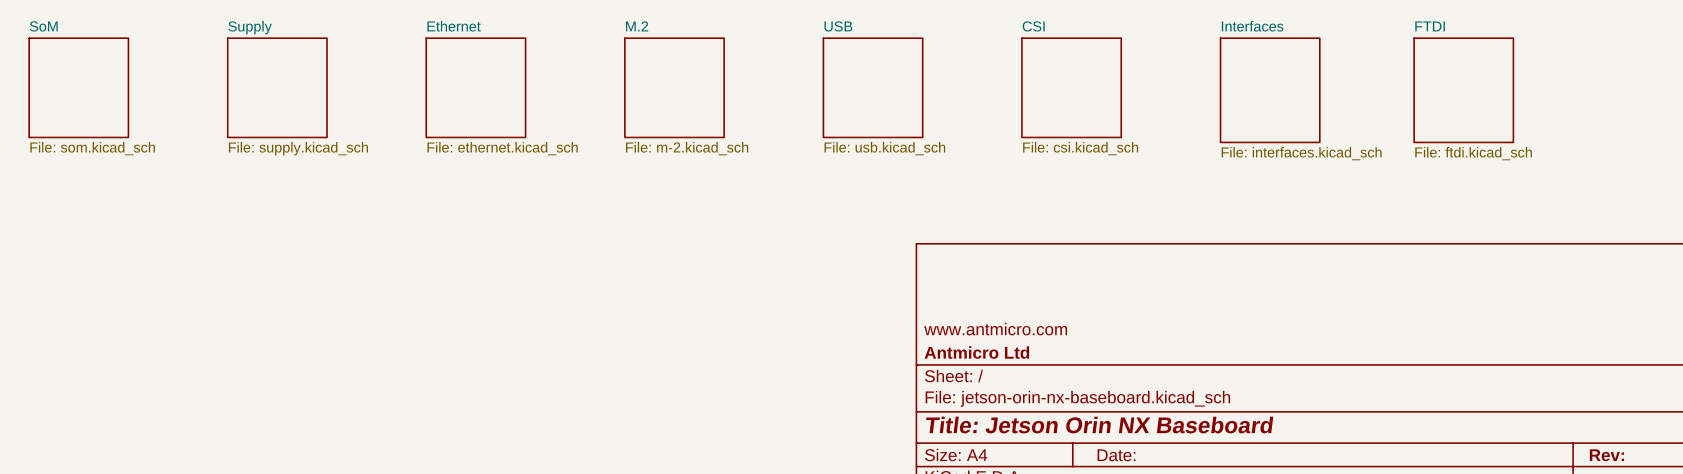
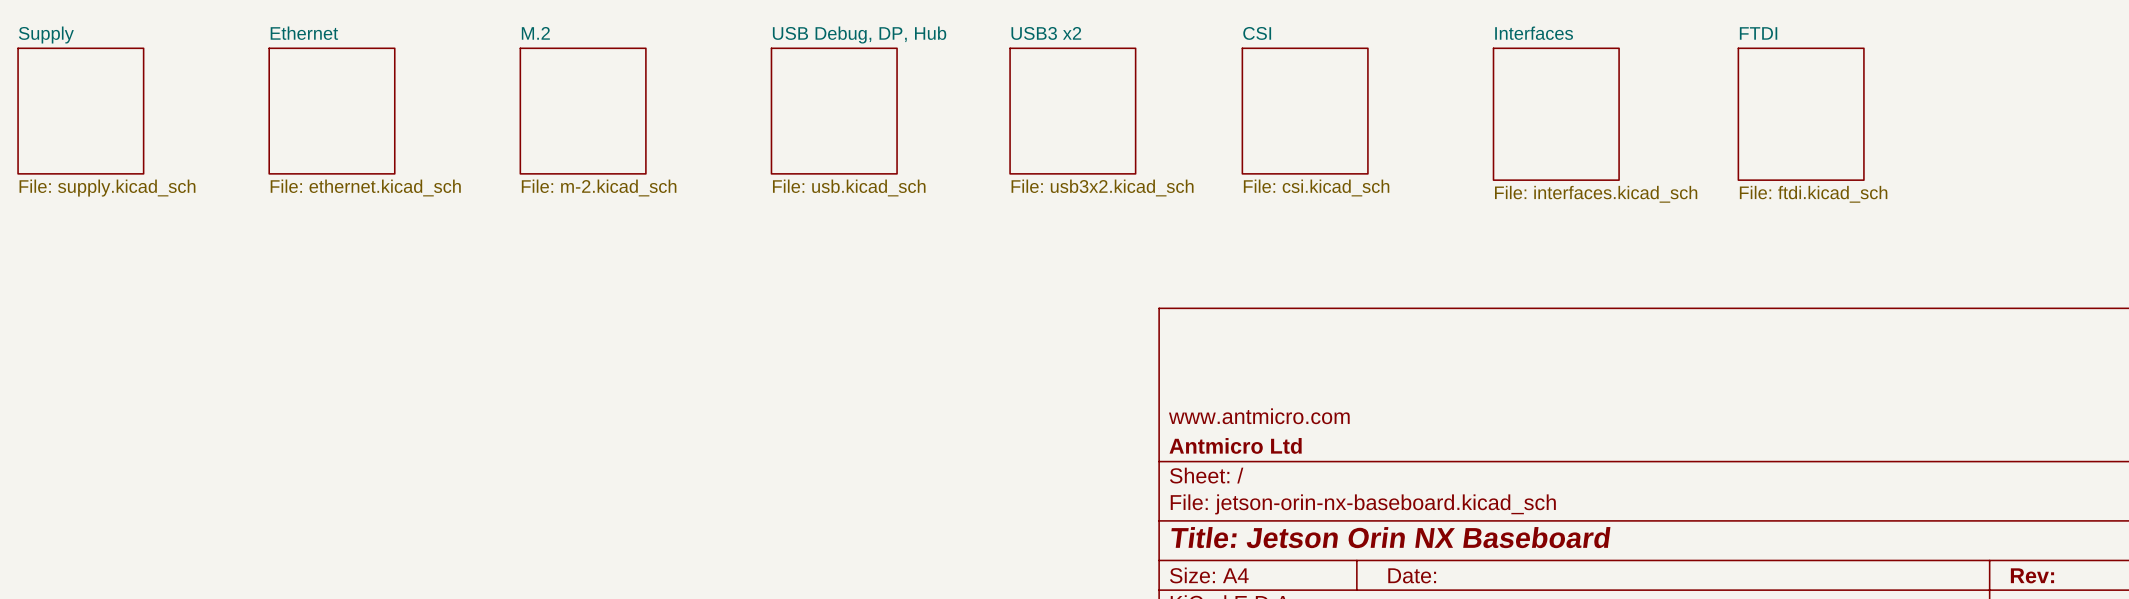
sheet Supply: none -> File: supply.kicad_sch (80, 111)
sheet SoM: File: som.kicad_sch (78, 87) -> none
sheet Ethernet: none -> File: ethernet.kicad_sch (331, 111)
sheet Supply: File: supply.kicad_sch (277, 87) -> none
sheet Ethernet: File: ethernet.kicad_sch (475, 87) -> none
sheet USB Debug, DP, Hub: none -> File: usb.kicad_sch (834, 111)
sheet M.2 position: (674, 87) -> (583, 111)
sheet USB3 x2: none -> File: usb3x2.kicad_sch (1072, 111)
sheet USB: File: usb.kicad_sch (873, 87) -> none
sheet CSI position: (1071, 87) -> (1305, 111)
sheet Interfaces position: (1270, 90) -> (1556, 114)
sheet FTDI position: (1463, 90) -> (1801, 114)

